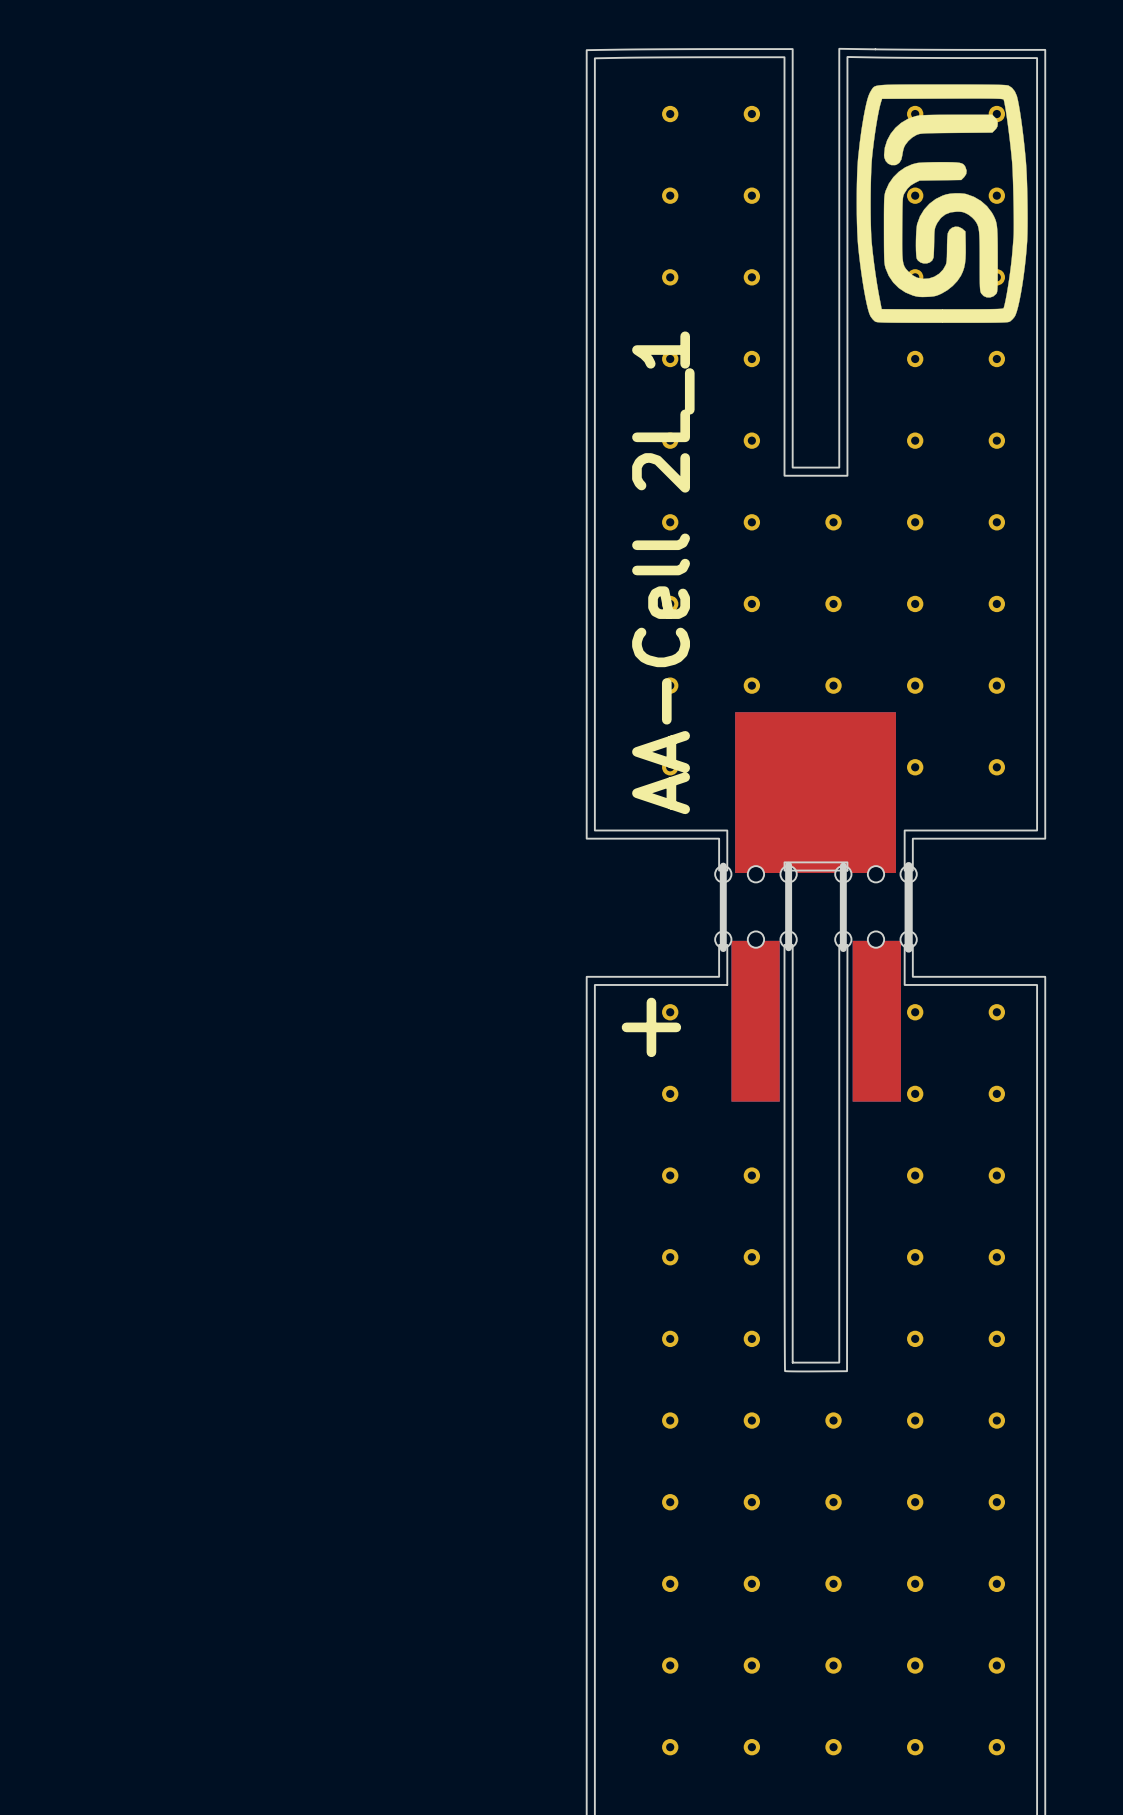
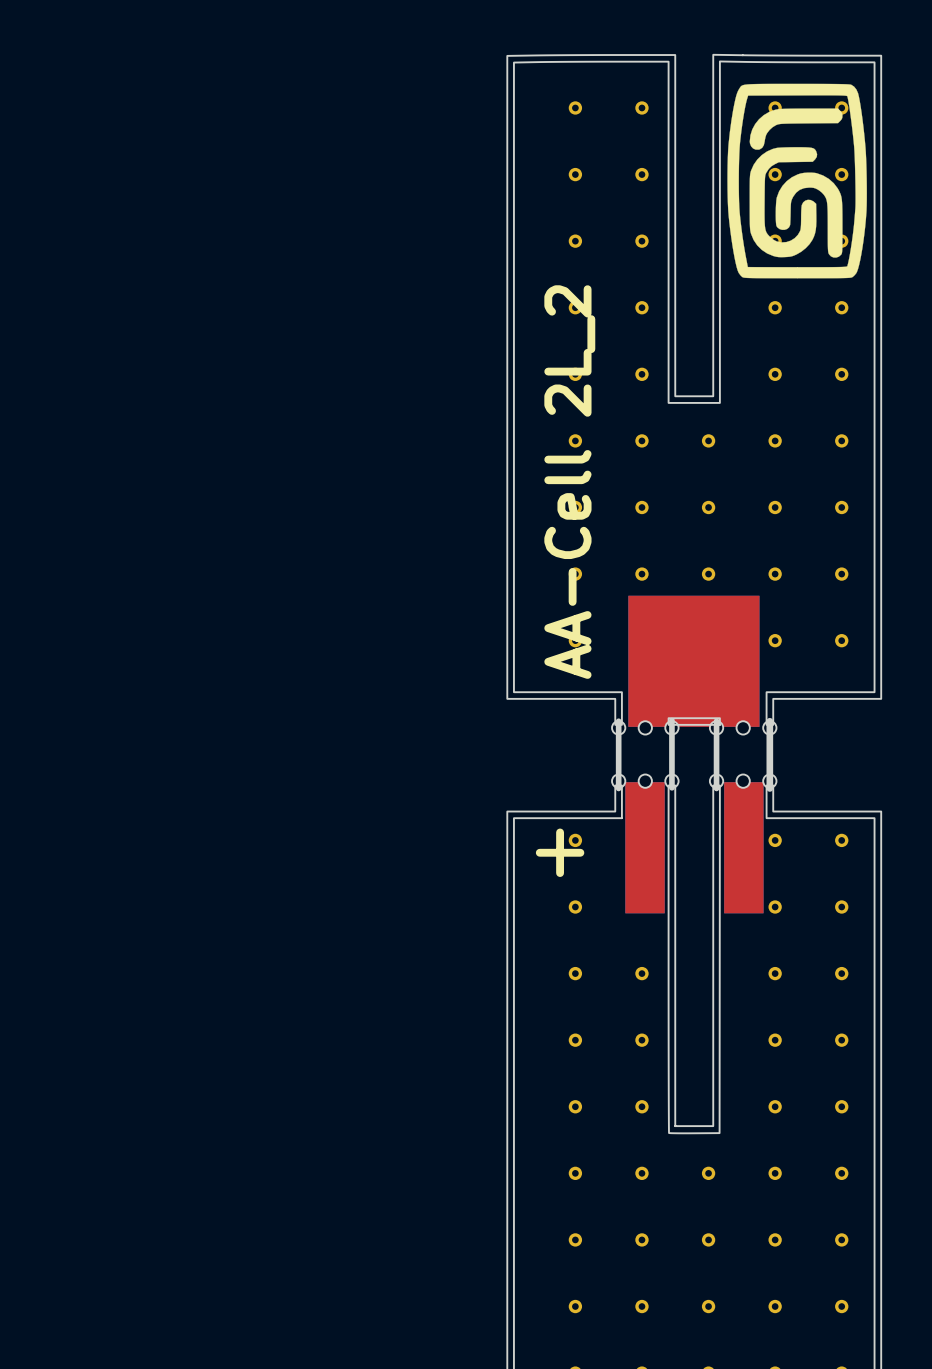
text: AA-Cell 2L_1 (663, 572) -> AA-Cell 2L_2 (569, 482)

